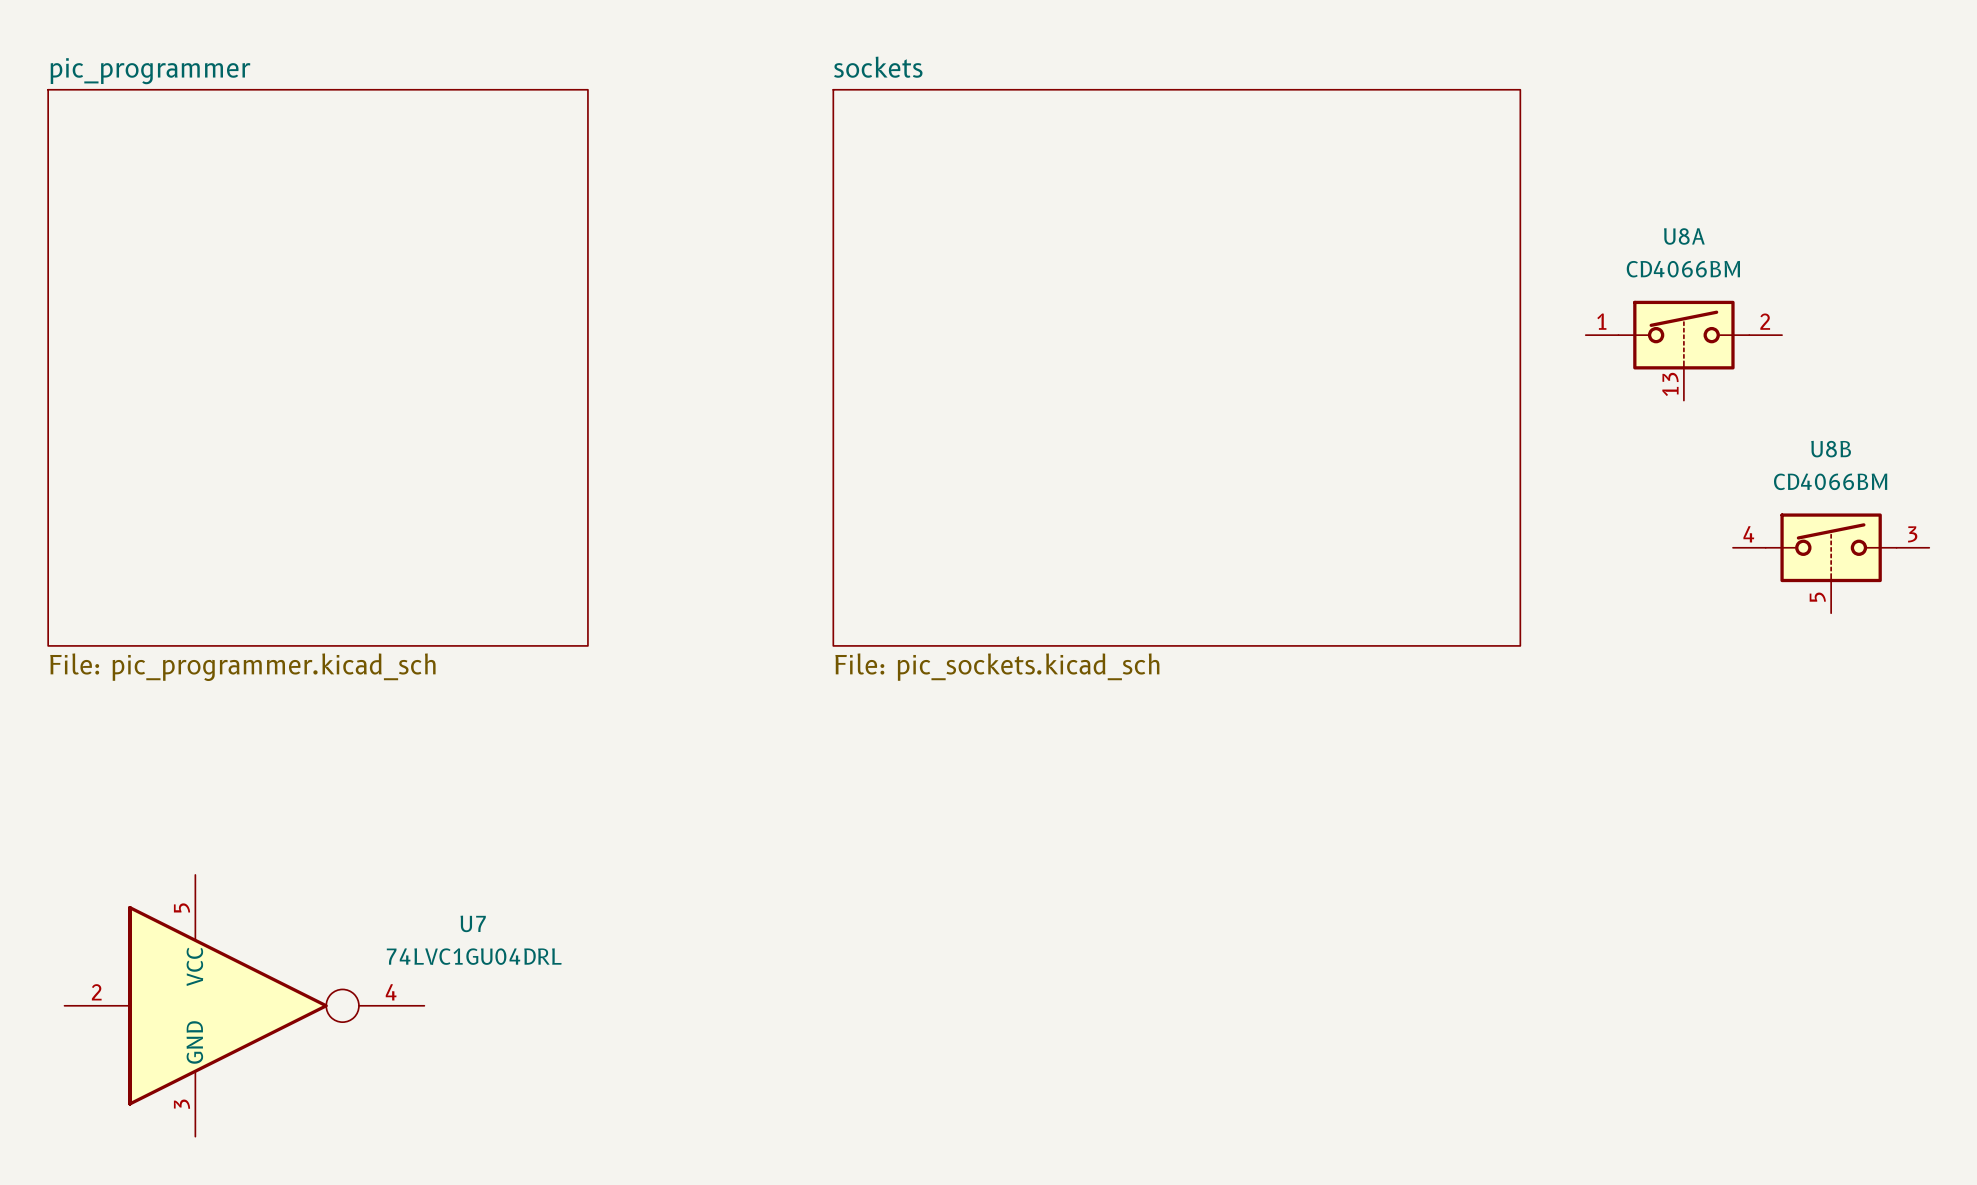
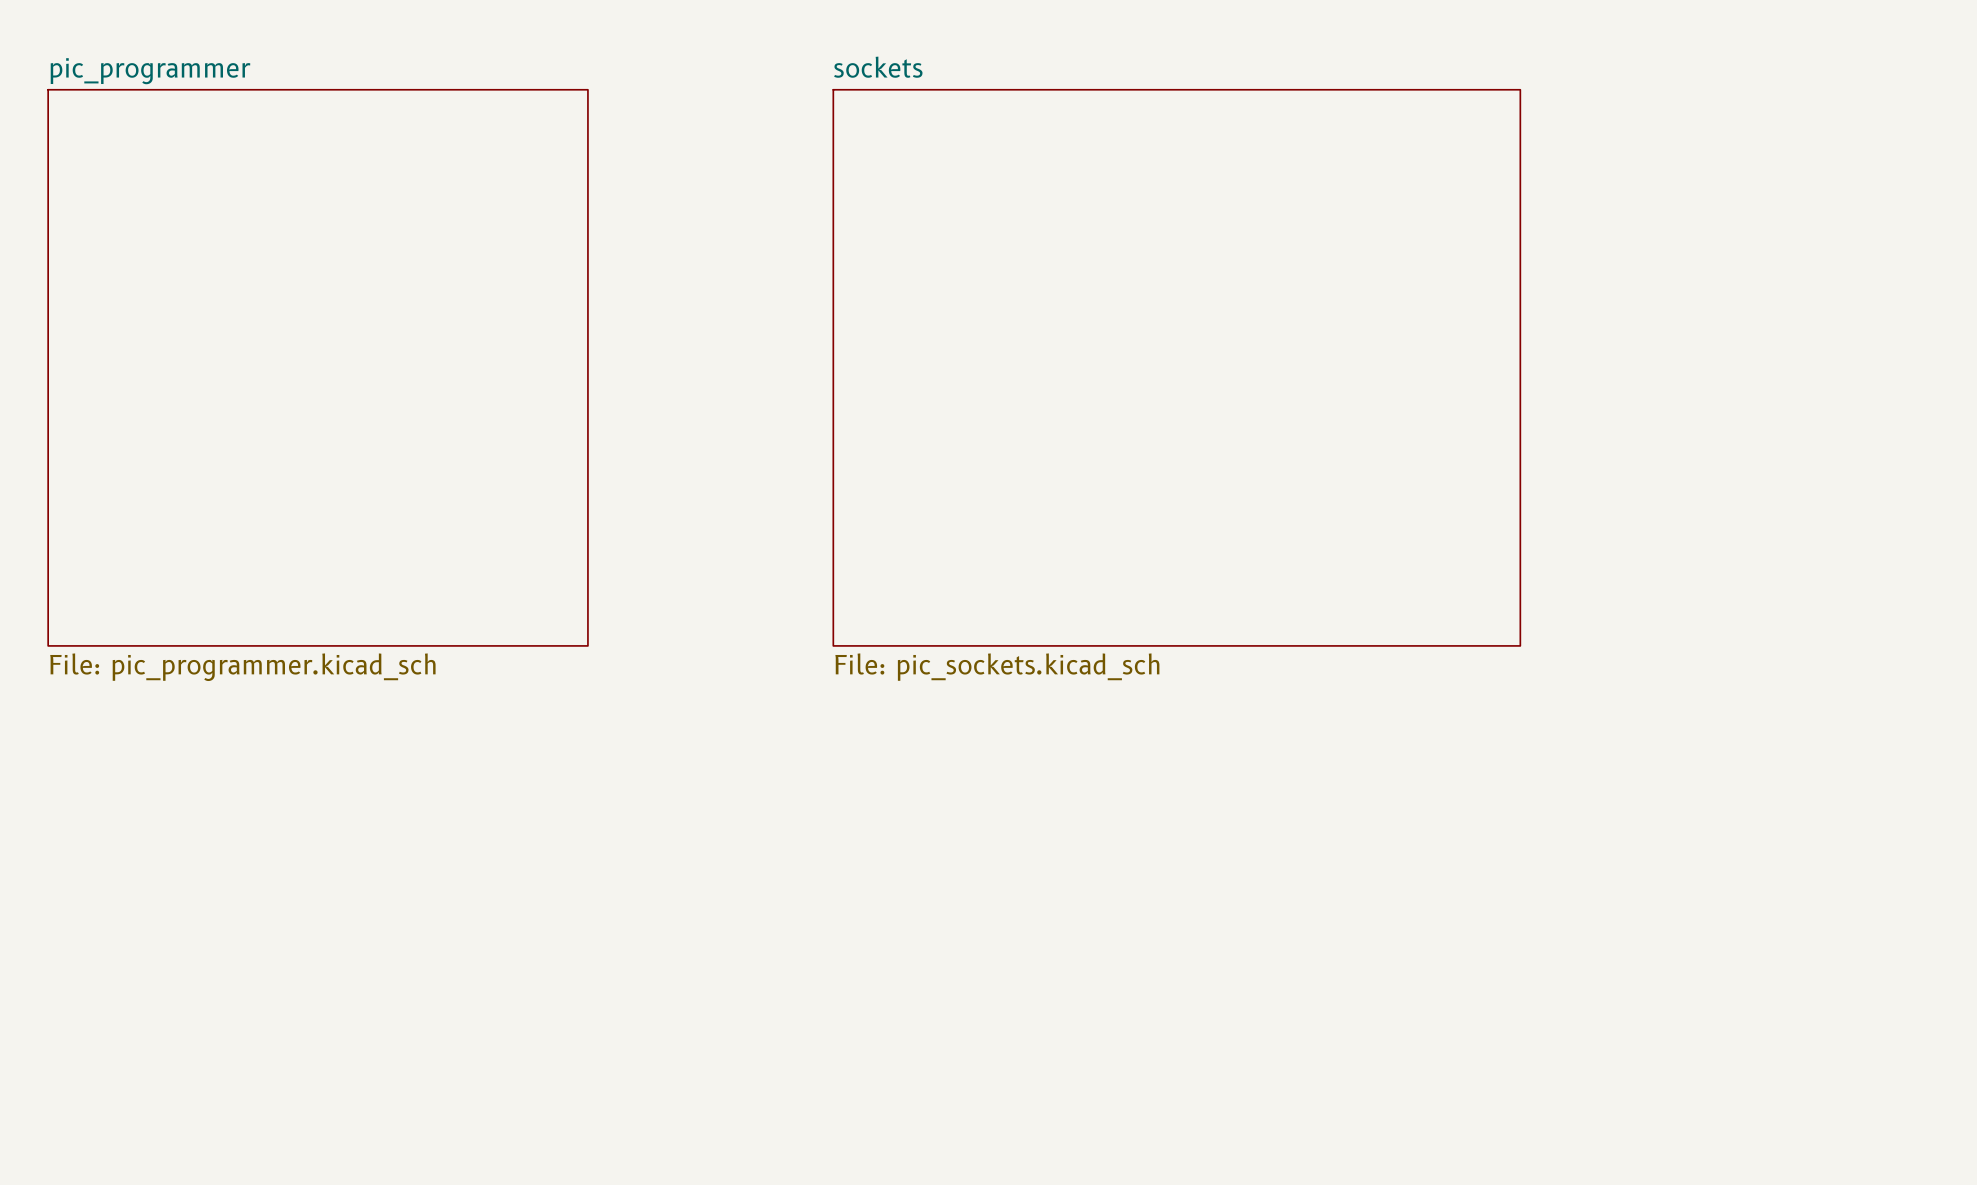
U8A: CD4066BM (1683, 350) -> none
U8B: CD4066BM (1831, 563) -> none
U7: 74LVC1GU04DRL (244, 1005) -> none

